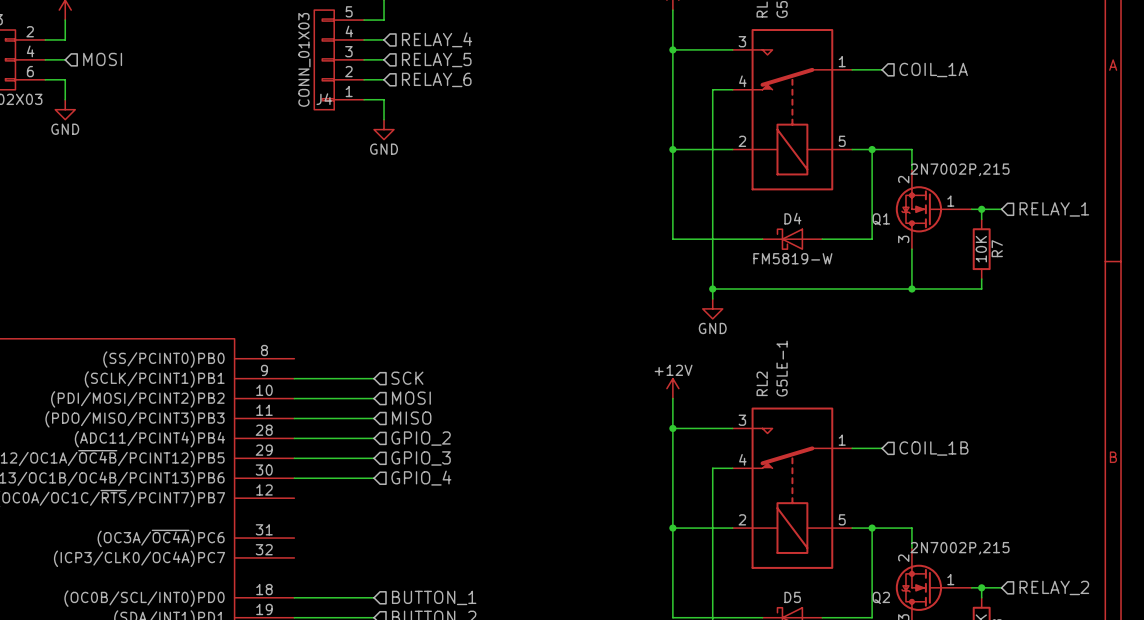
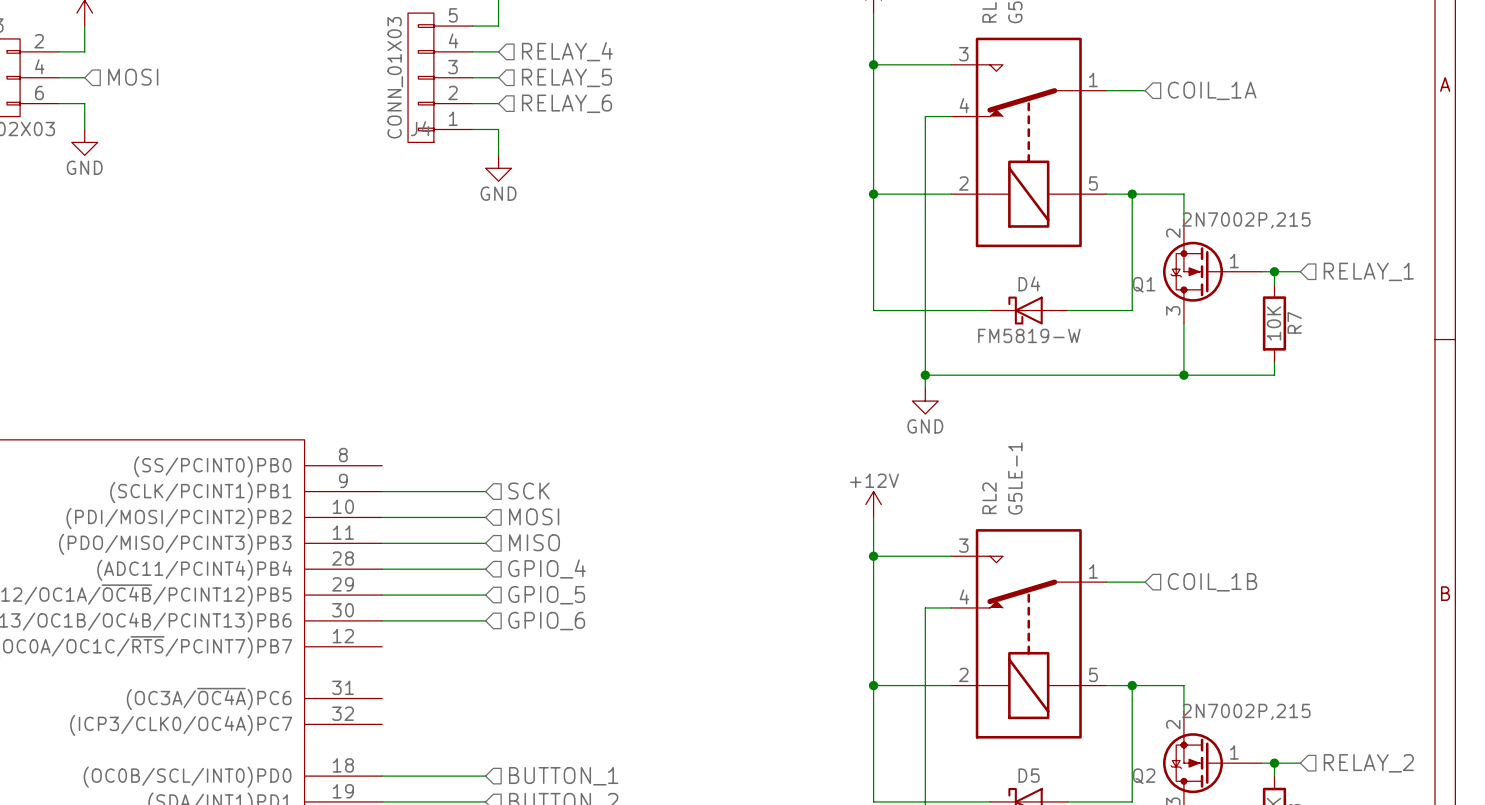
hierarchical label: GPIO_2 (421, 438) -> GPIO_4 (547, 568)
hierarchical label: GPIO_3 (421, 458) -> GPIO_5 (546, 595)
hierarchical label: GPIO_4 (421, 478) -> GPIO_6 (546, 621)

